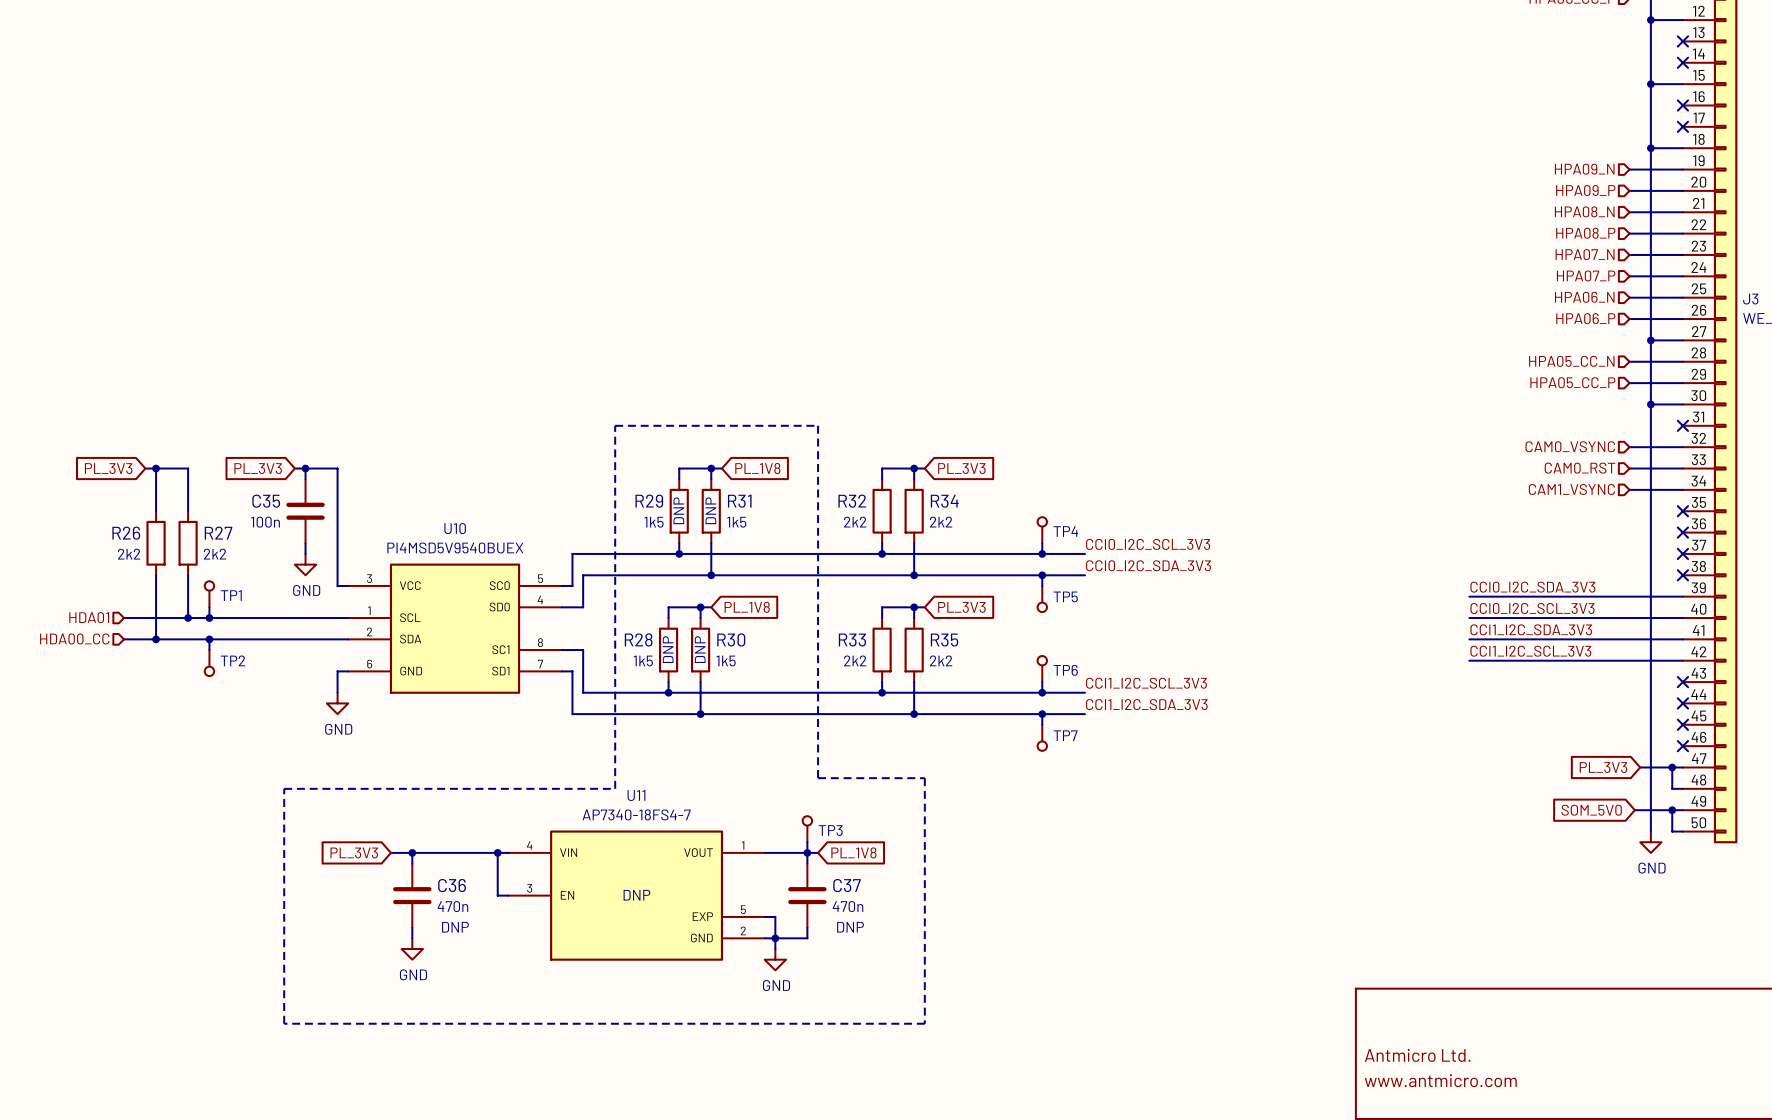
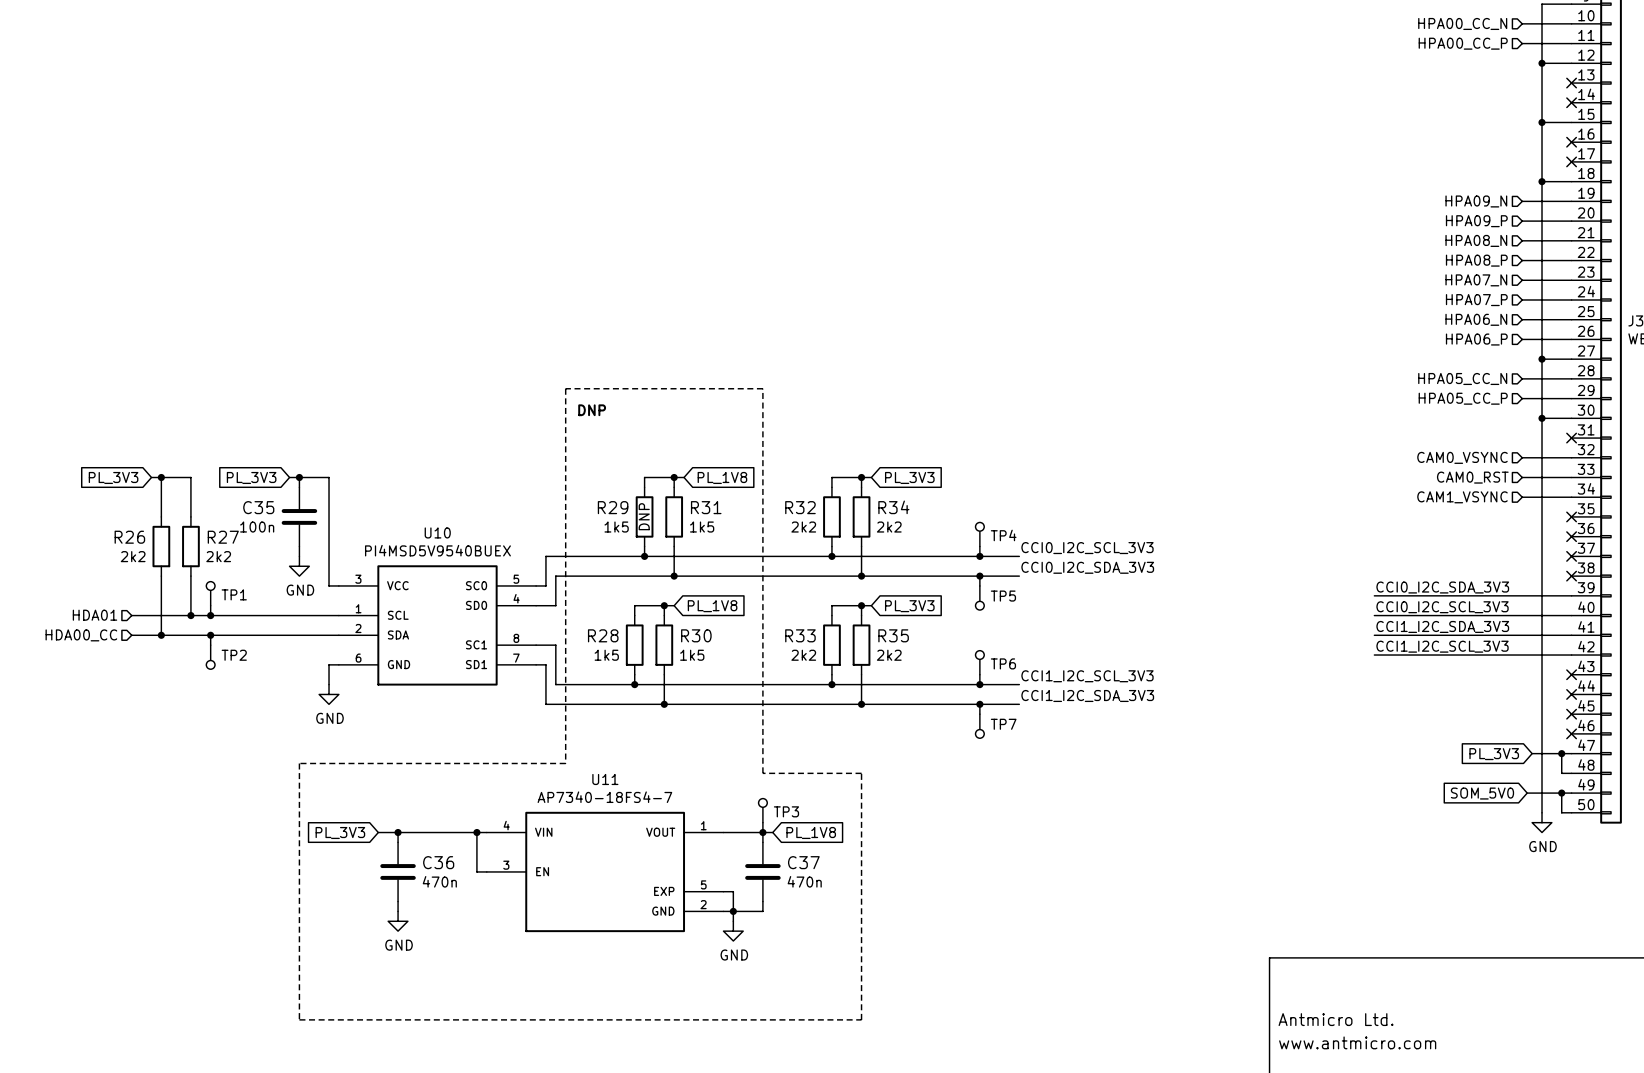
text: none -> DNP (592, 410)
line: (615, 425) (818, 425) (818, 778) (924, 778) (924, 1023) (284, 1023) (284, 788) (615, 788) (615, 425) -> (565, 388) (565, 763) (299, 763) (299, 1019) (861, 1019) (861, 773) (762, 773) (762, 388) (565, 388)
R31 text: DNP (710, 510) -> none
R28 text: DNP (668, 649) -> none
R30 text: DNP (700, 649) -> none
U11 text: DNP (636, 895) -> none
C36 text: DNP (455, 927) -> none
C37 text: DNP (850, 927) -> none

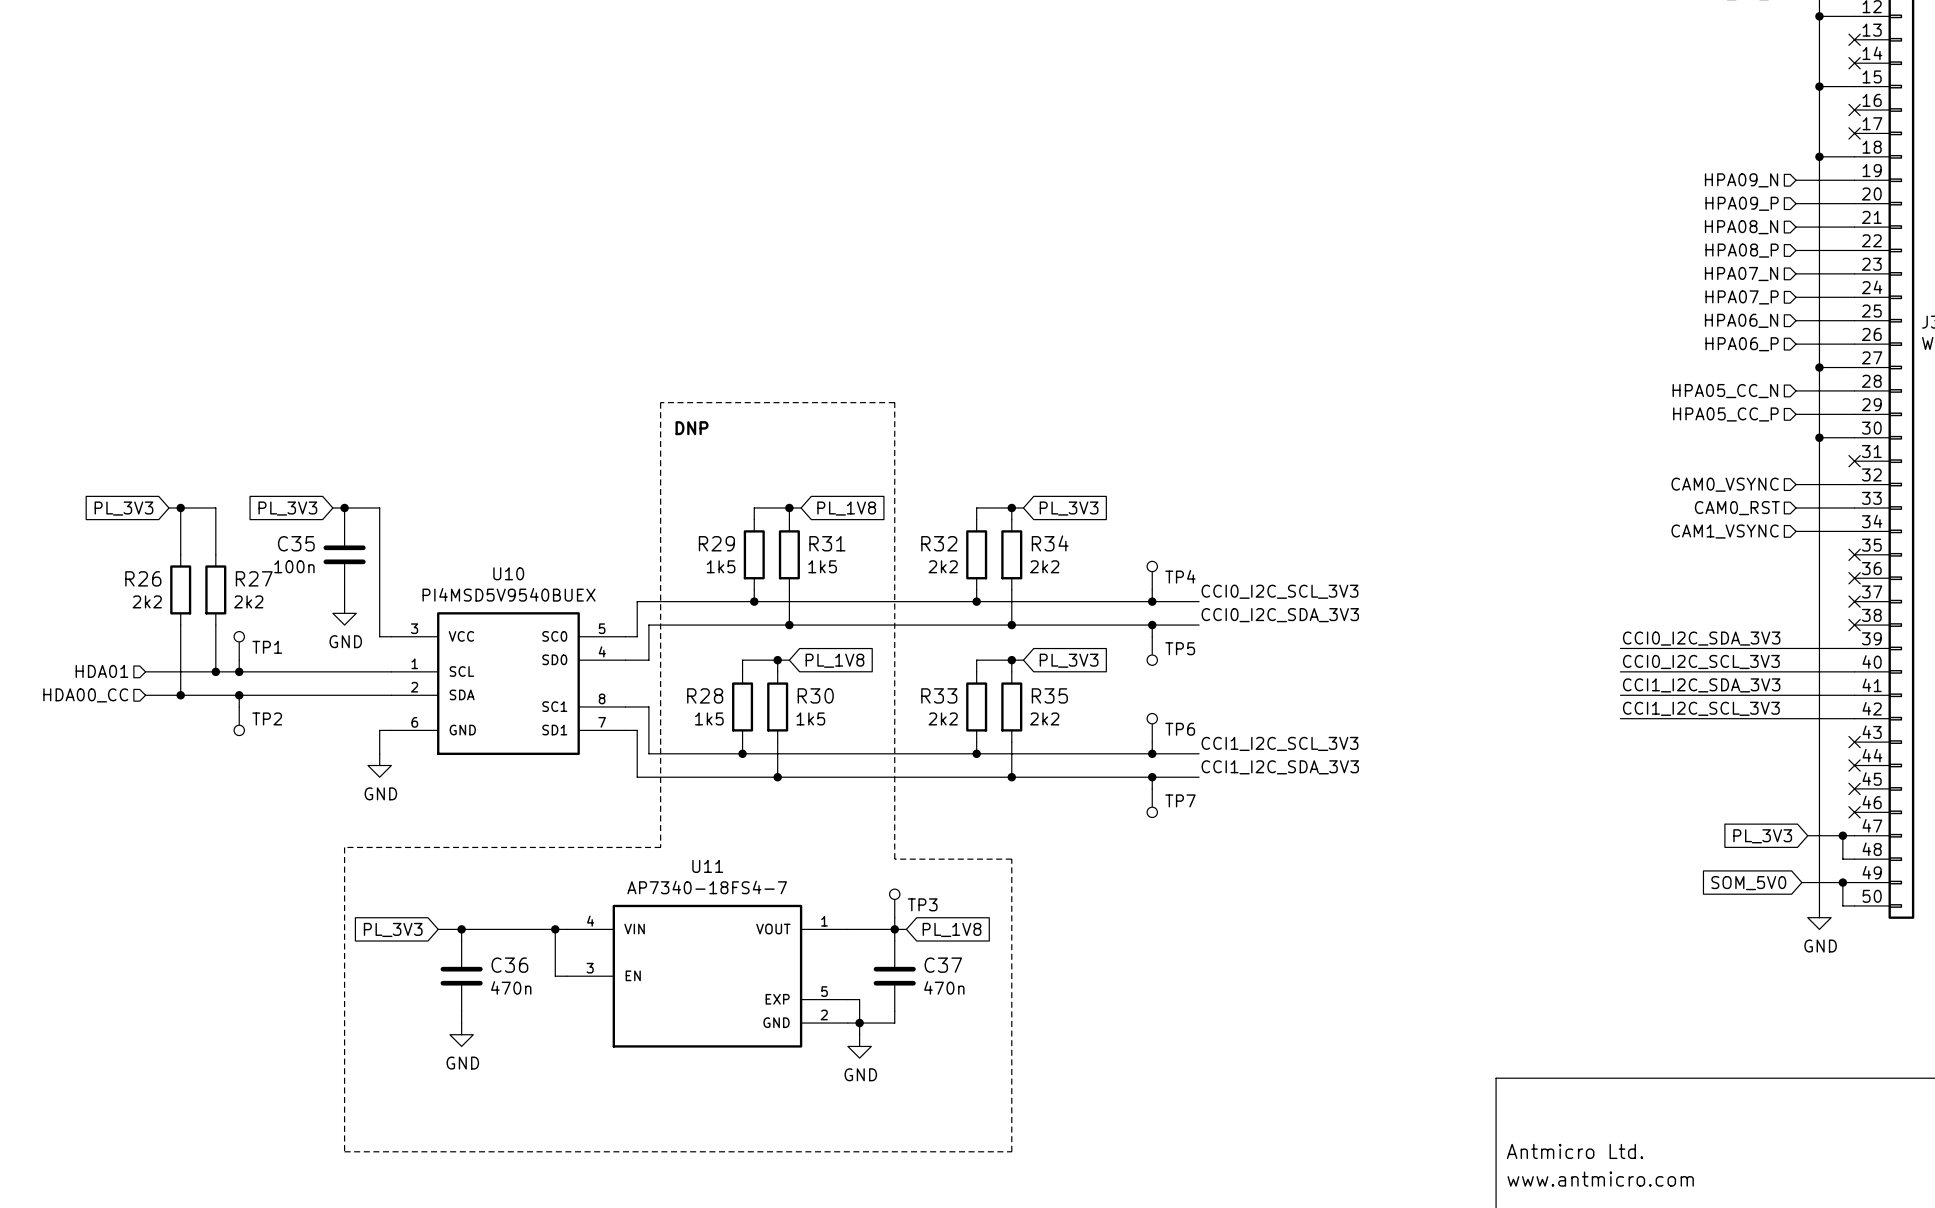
R29 text: DNP (644, 516) -> none

